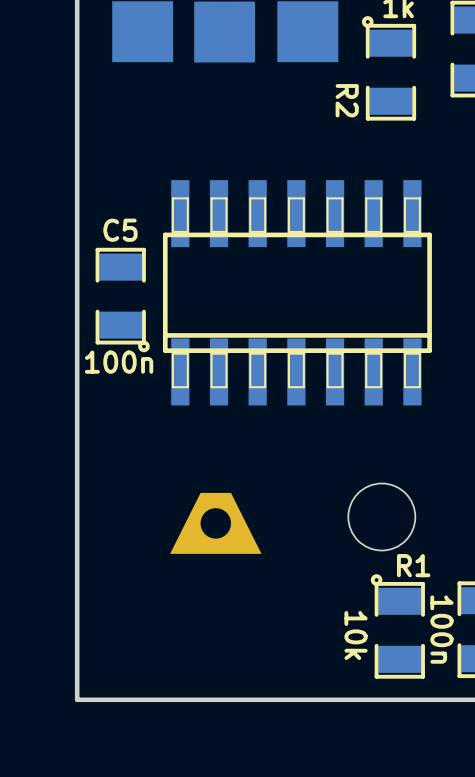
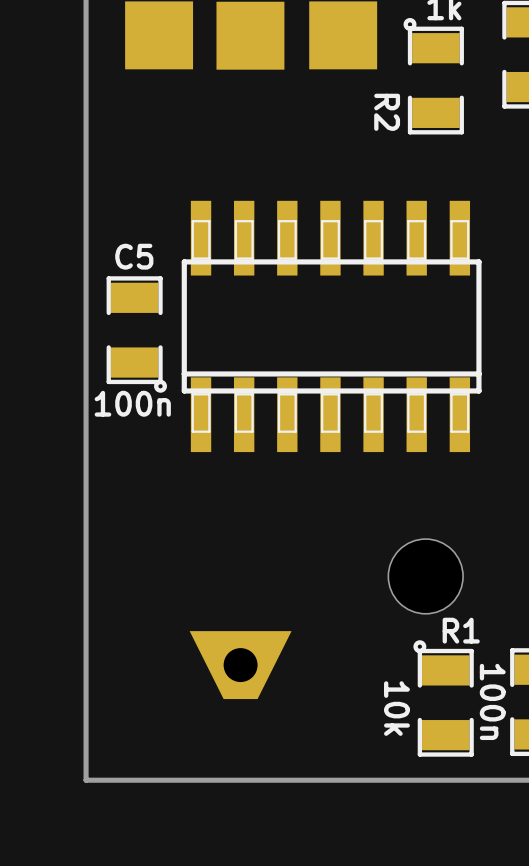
part rotation: 0° (215, 523) -> 180° (240, 665)
part position: (215, 523) -> (240, 665)

